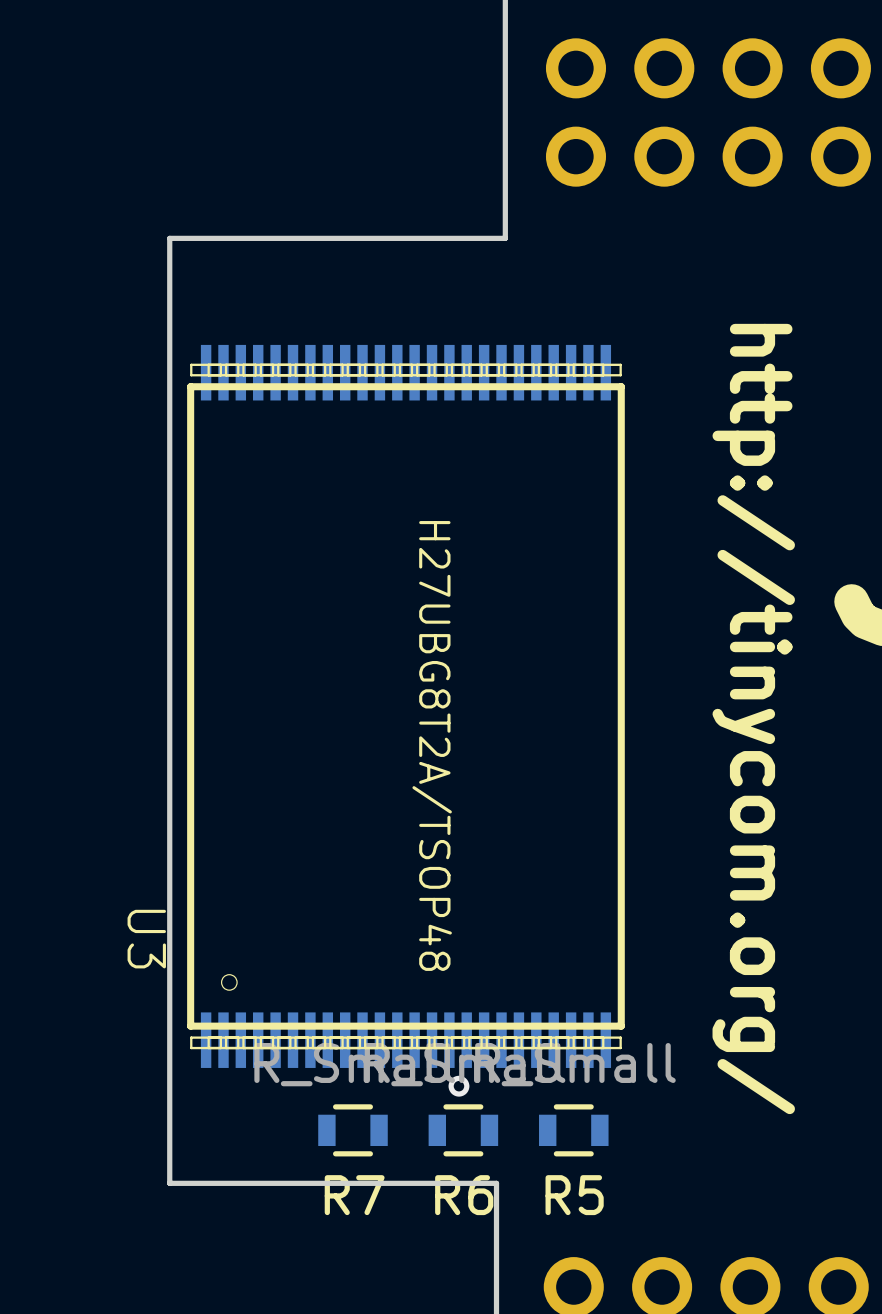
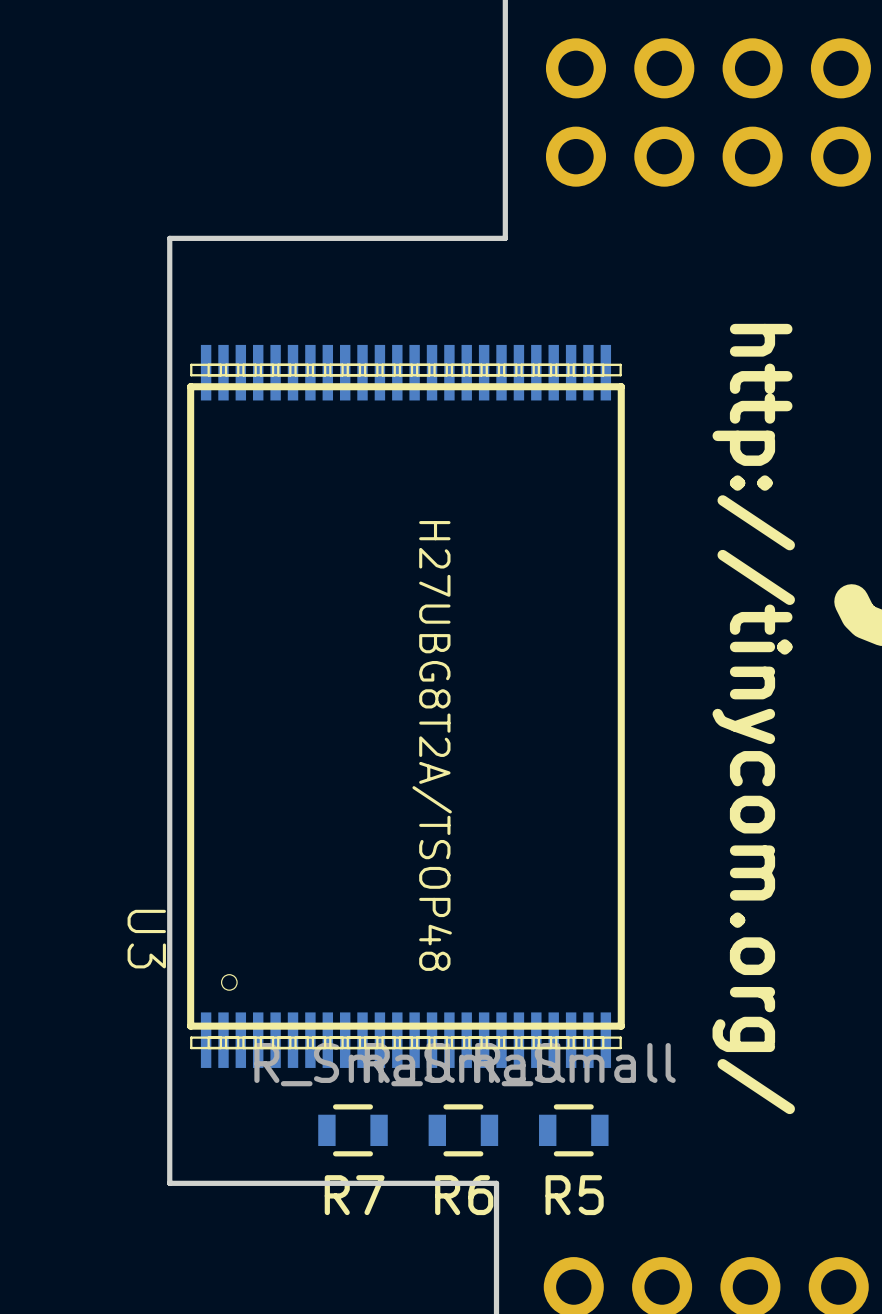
via: (458, 1086) -> none

